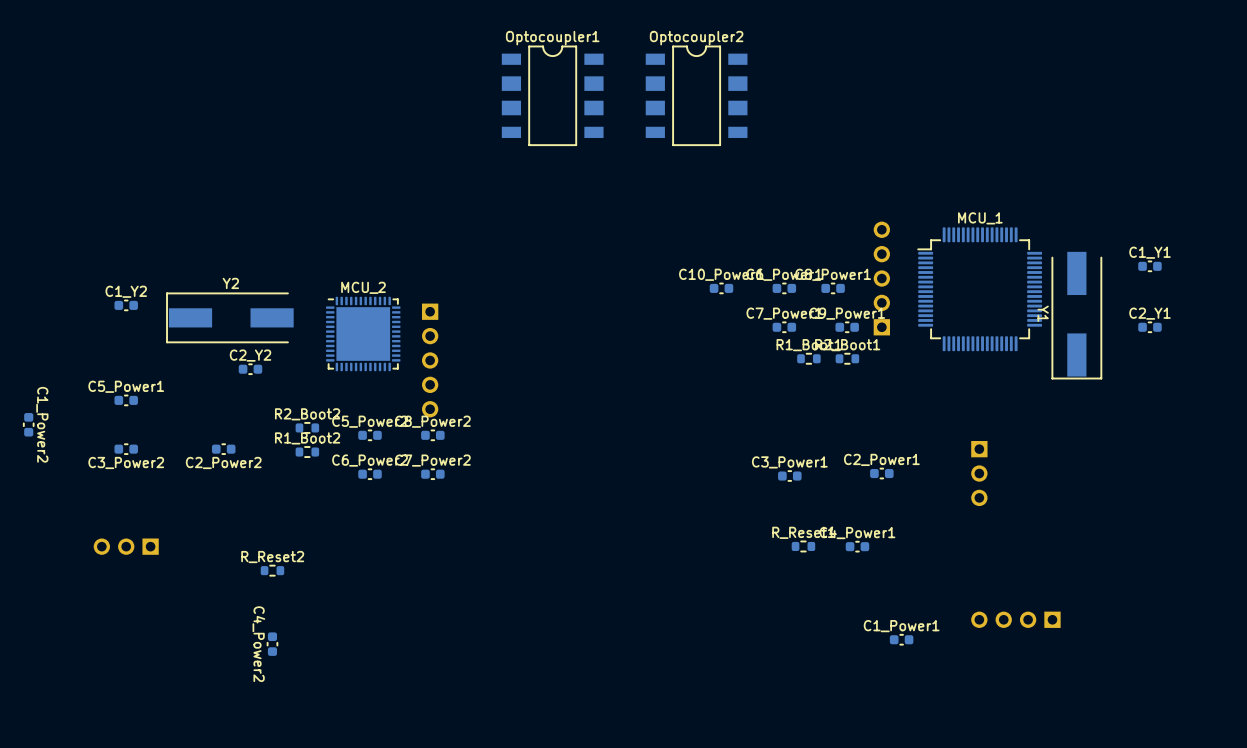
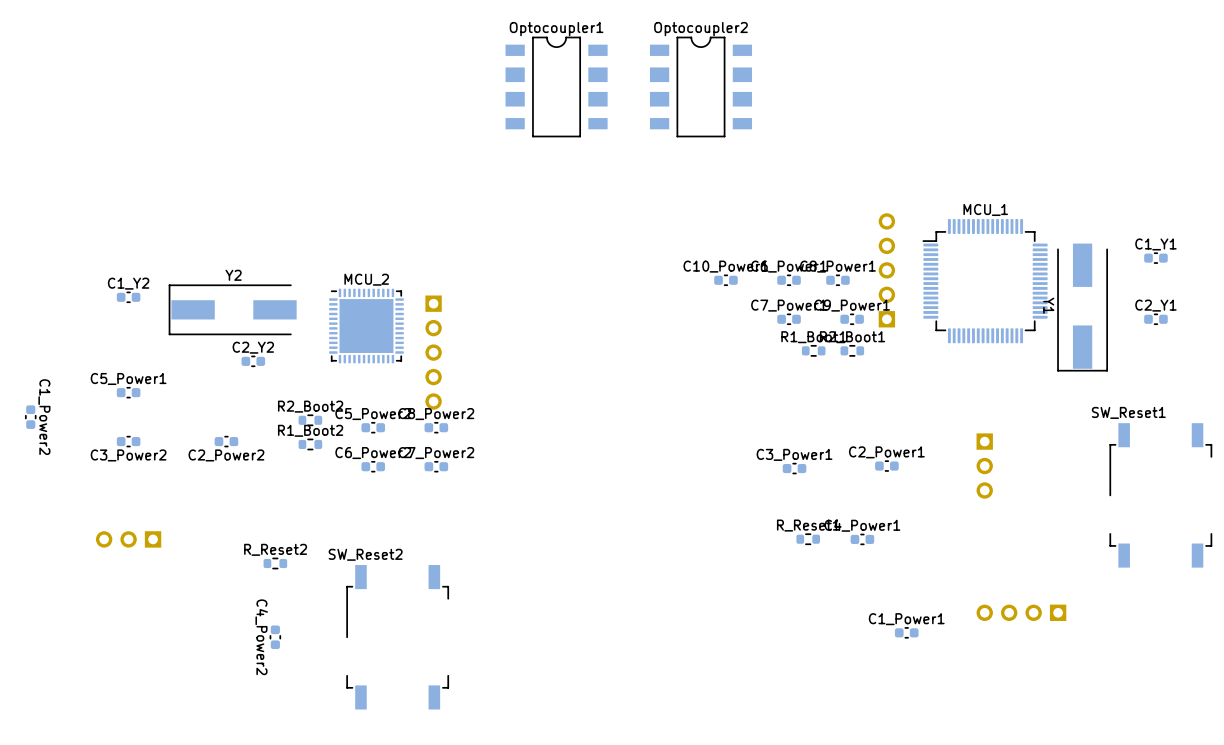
SW_Reset1: none -> (1160, 495)
SW_Reset2: none -> (397, 637)

